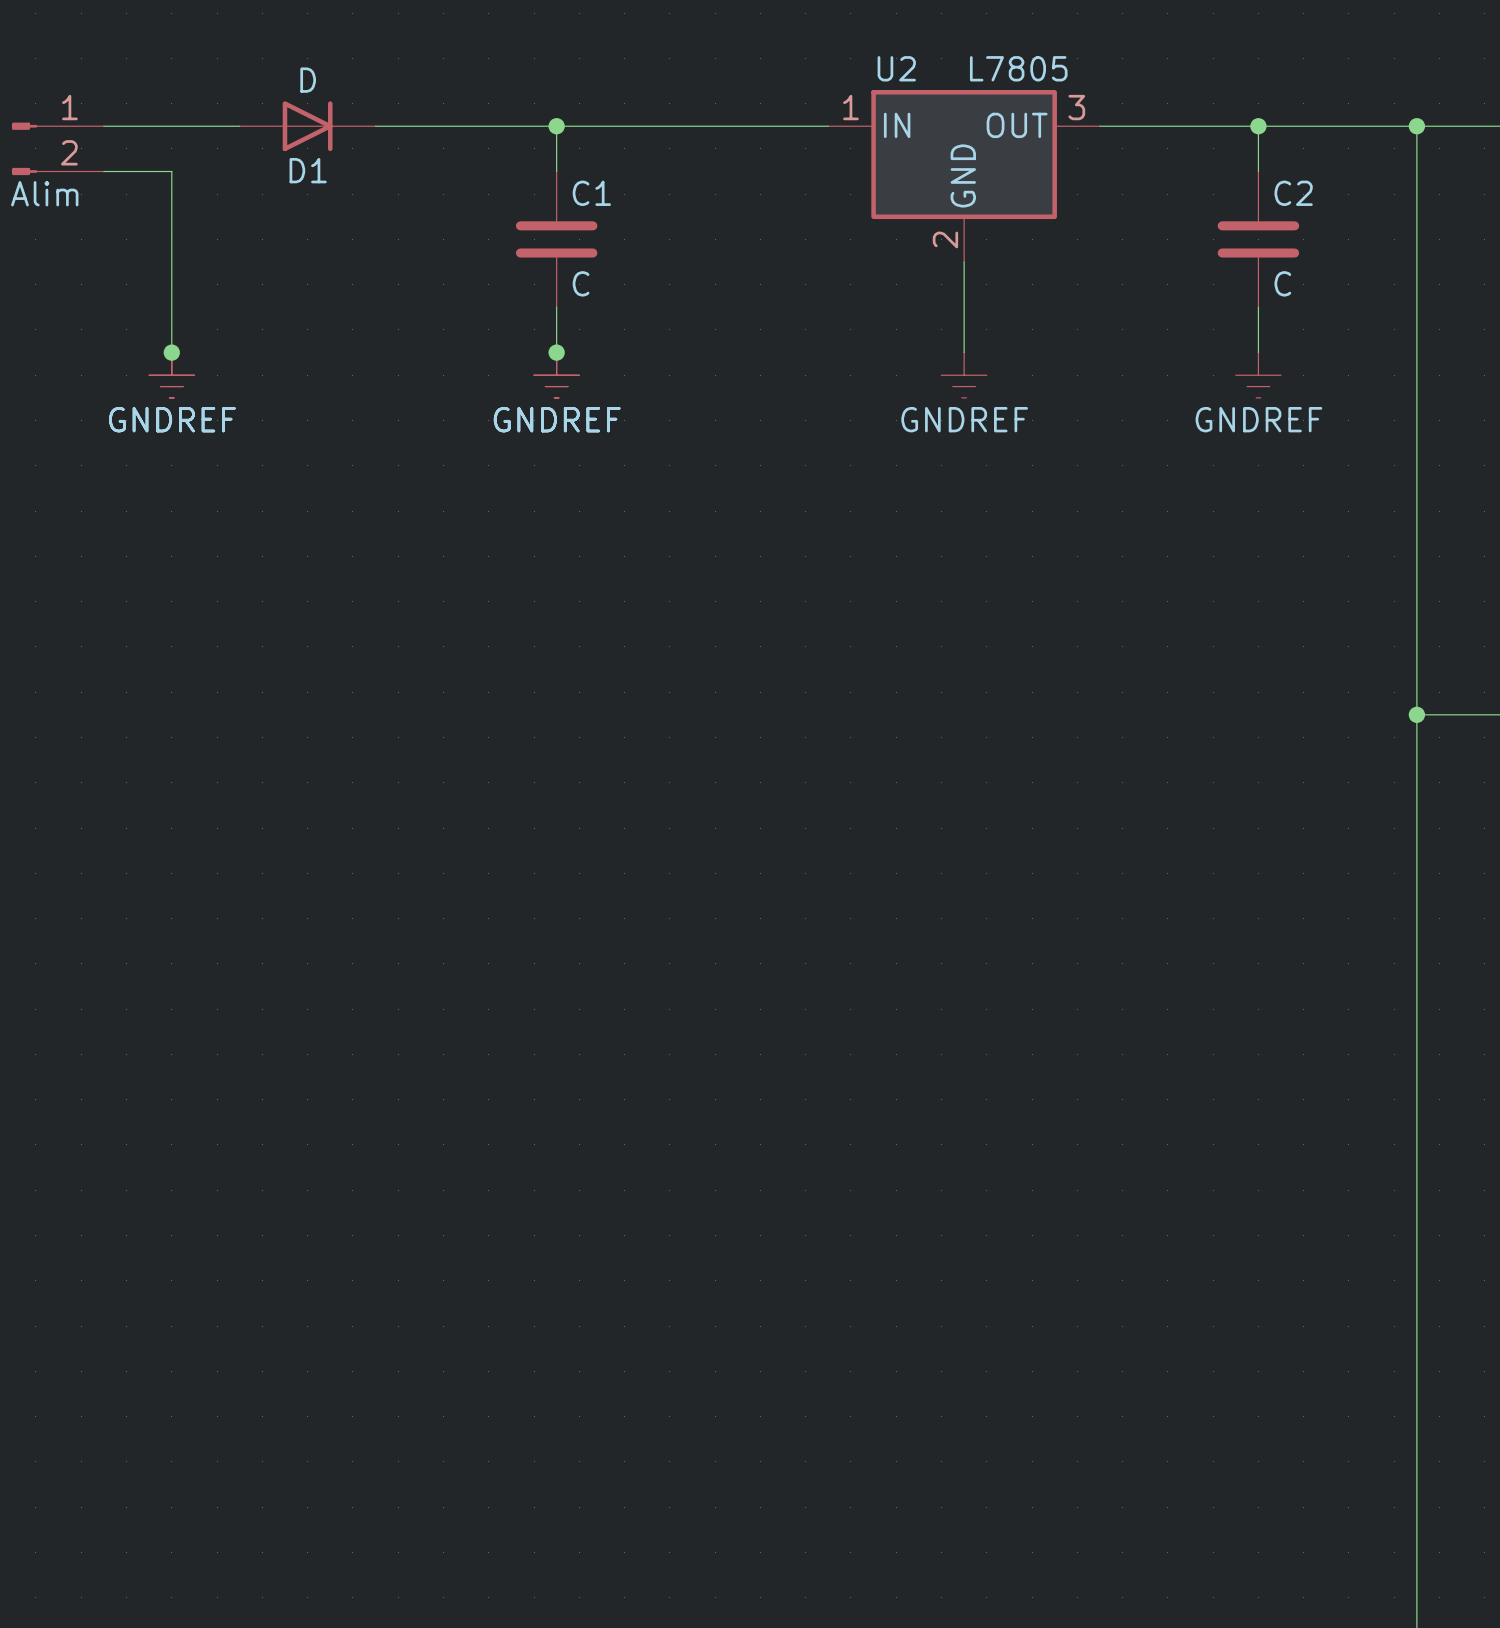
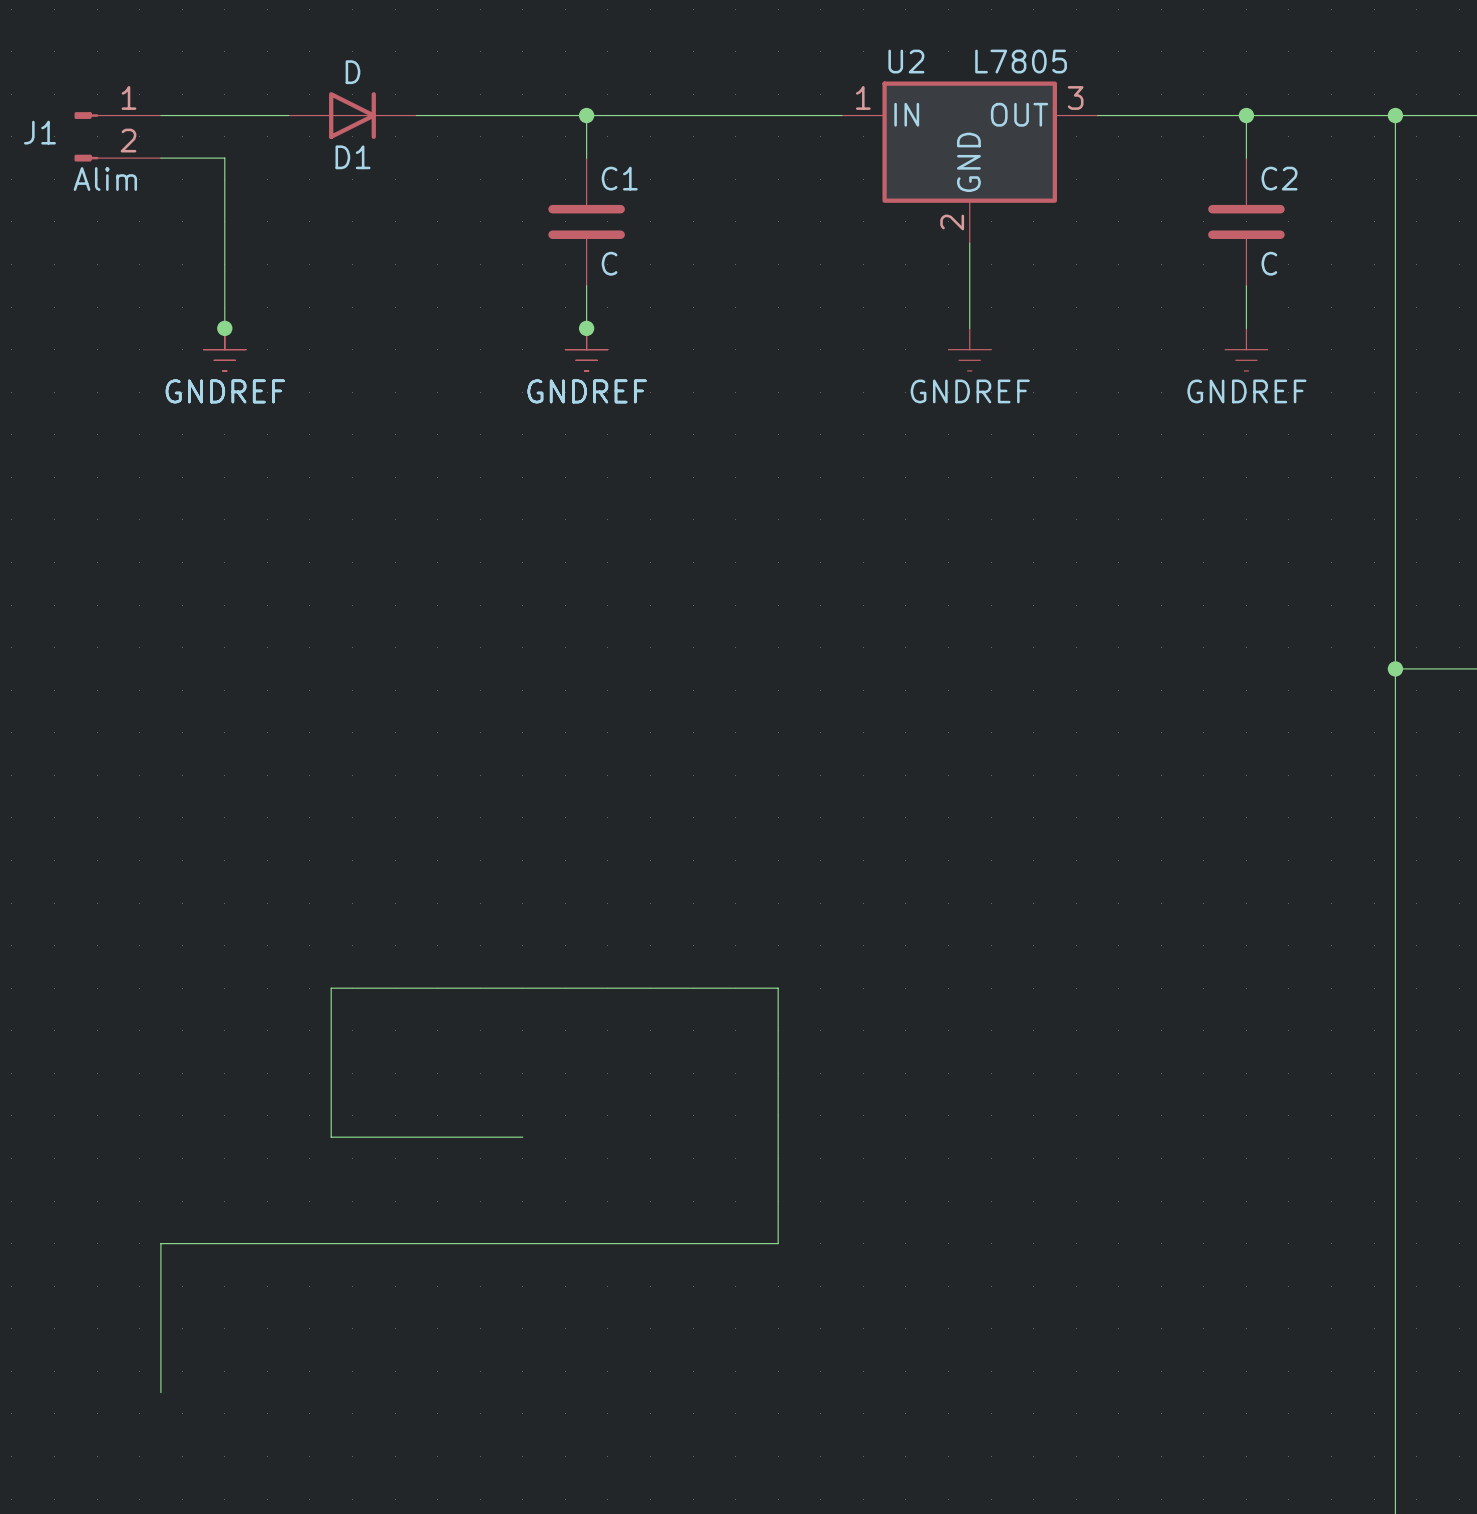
wire: none -> (522, 1137) (331, 1137) (331, 988) (778, 988) (778, 1243) (160, 1243) (160, 1392)

